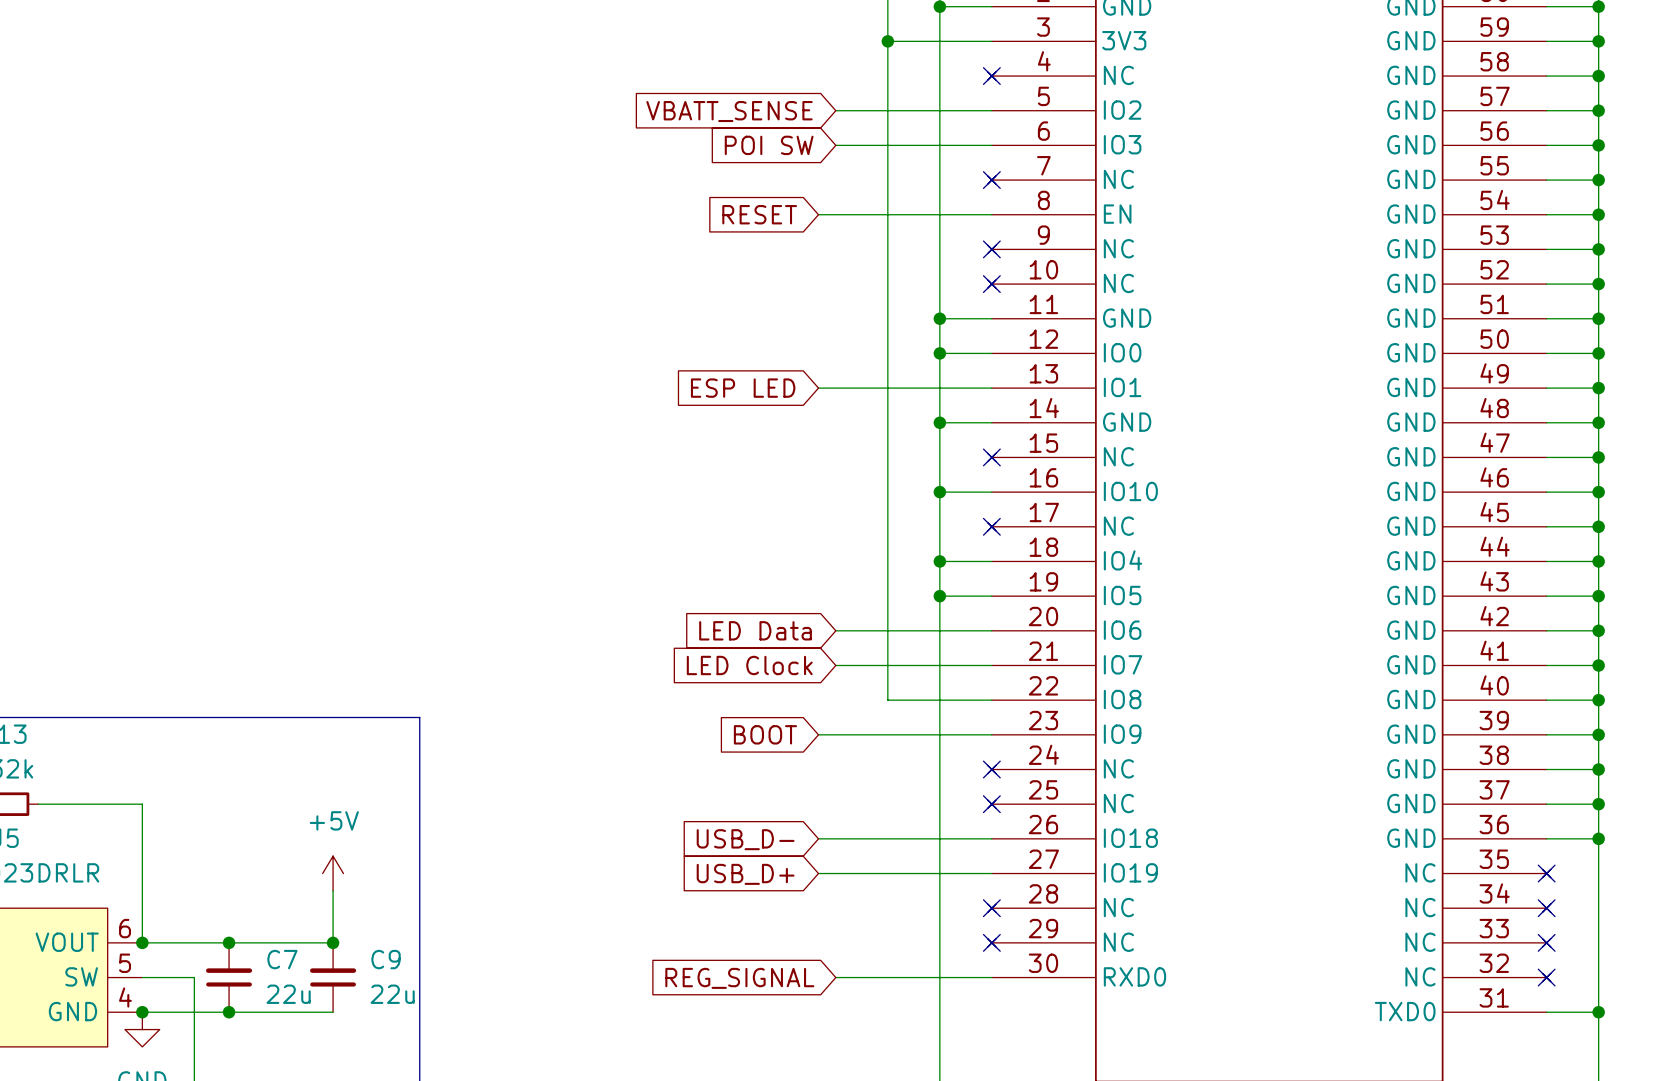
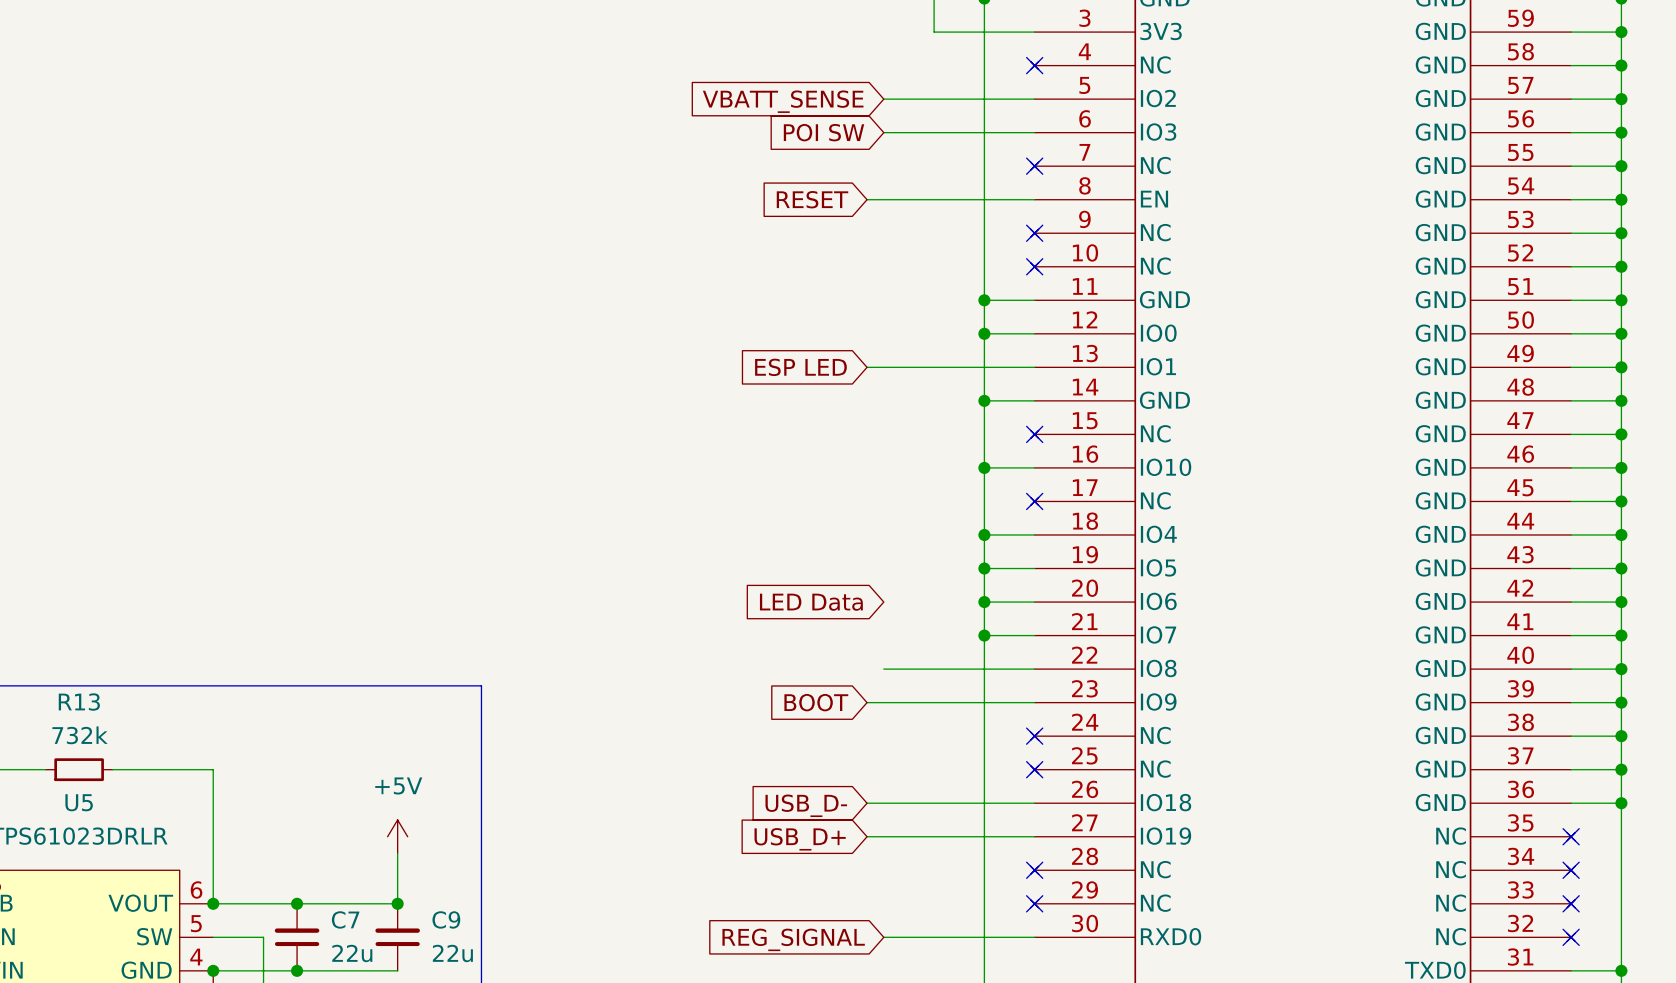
wire: (887, 41) (887, 700) -> (883, 669) (934, 669)
junction: (887, 41) -> none
wire: (835, 630) (939, 630) -> none
junction: none -> (984, 602)
global label: LED Clock (749, 665) -> none
wire: (835, 665) (939, 665) -> none
junction: none -> (984, 635)

